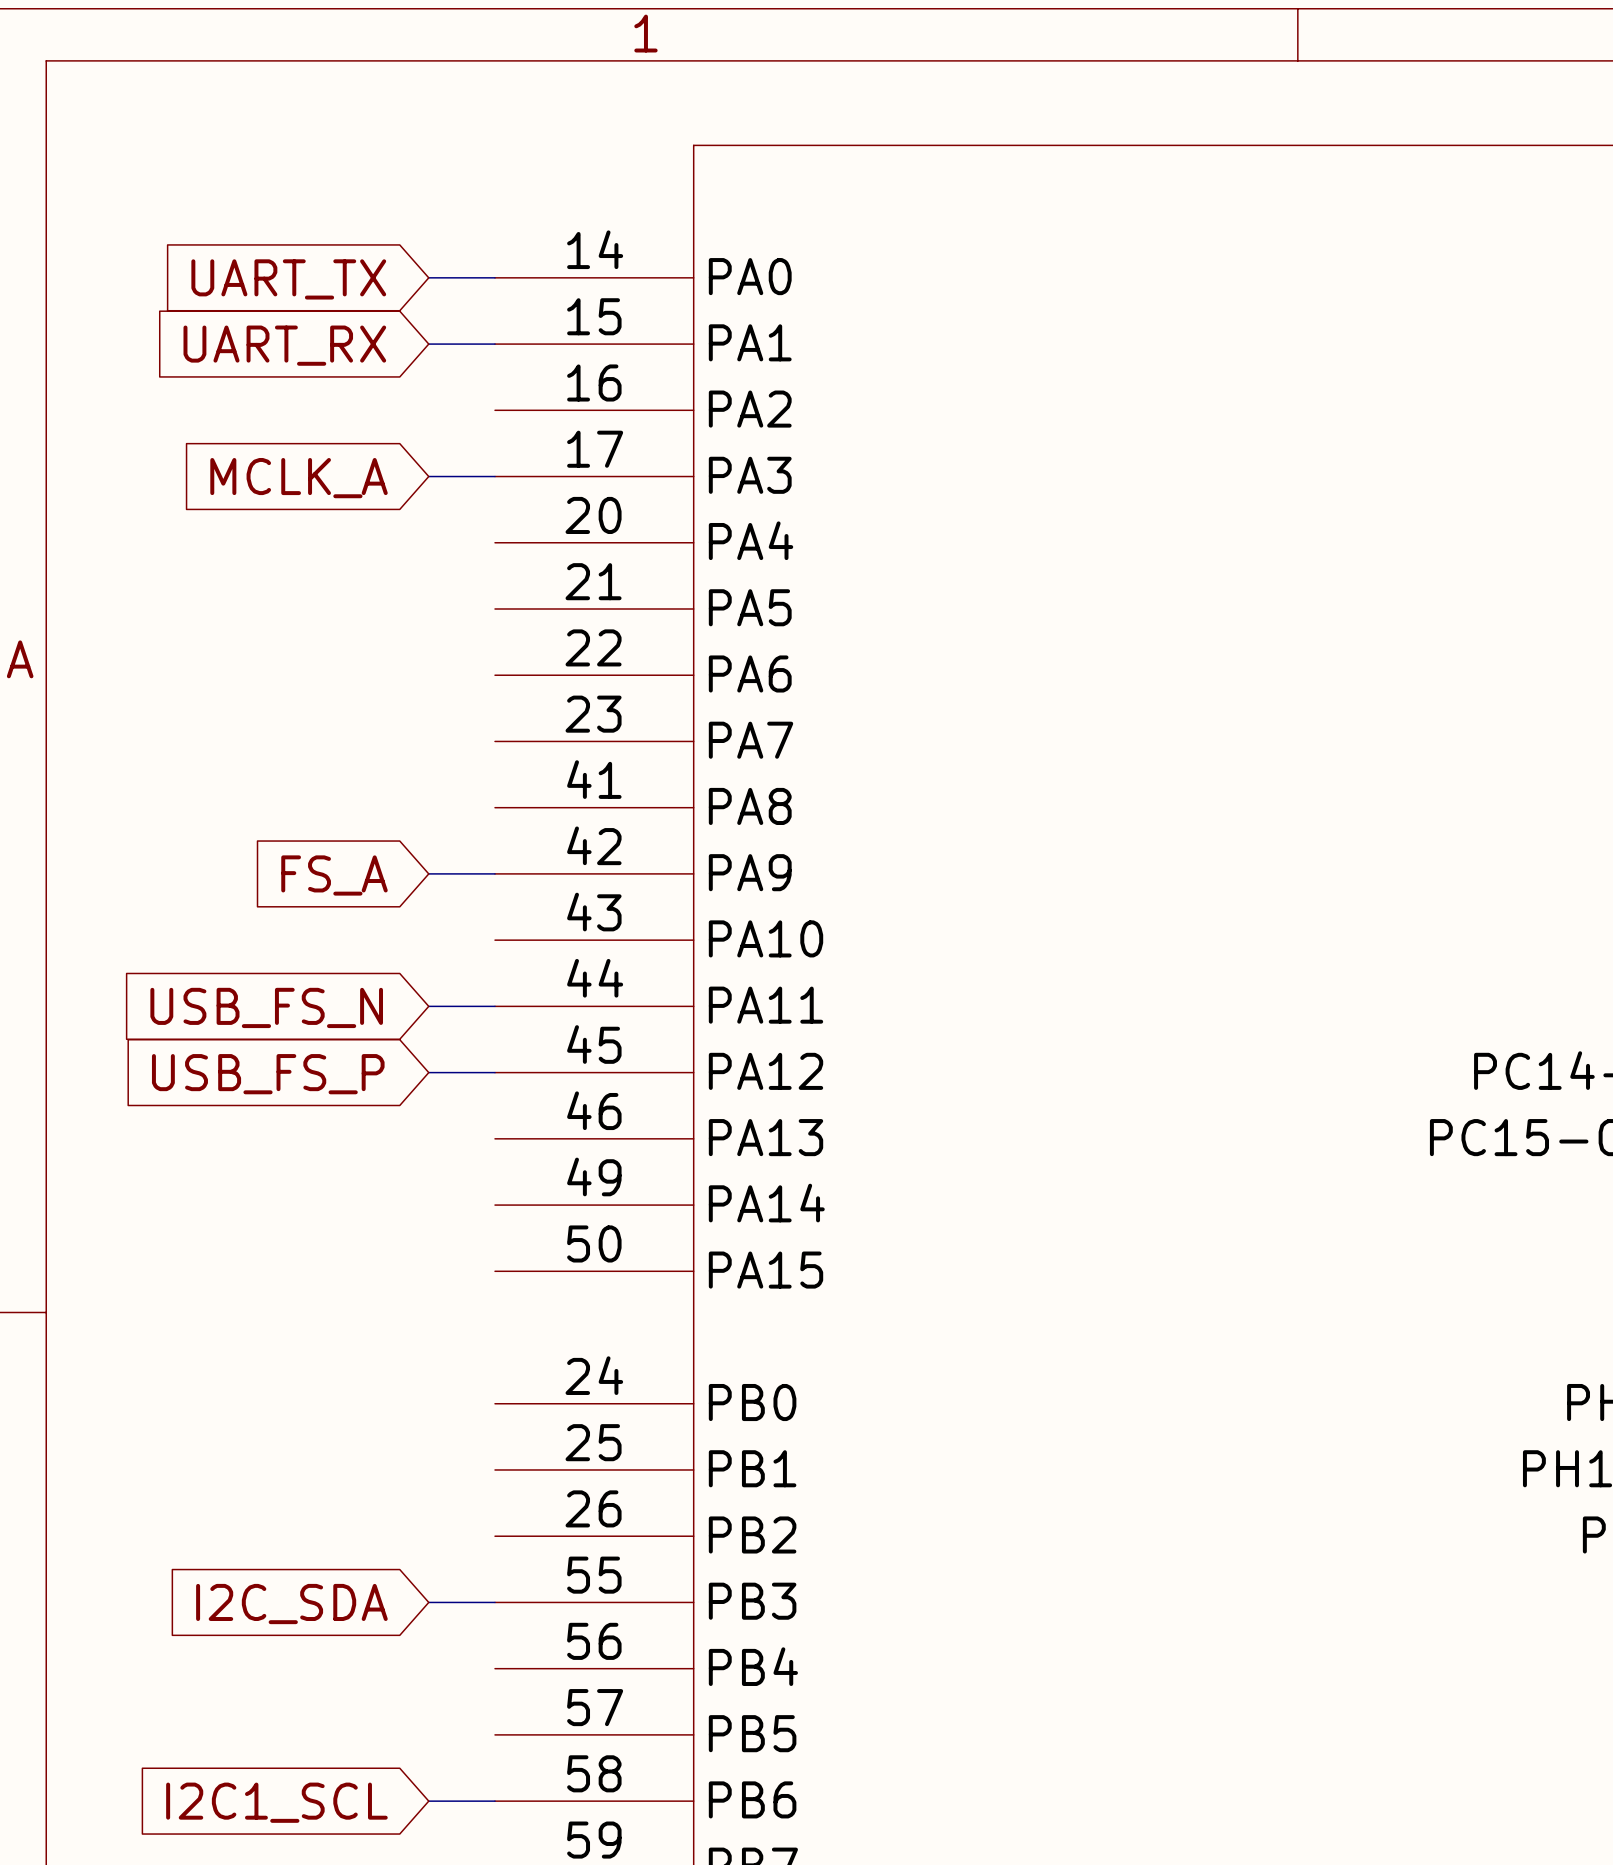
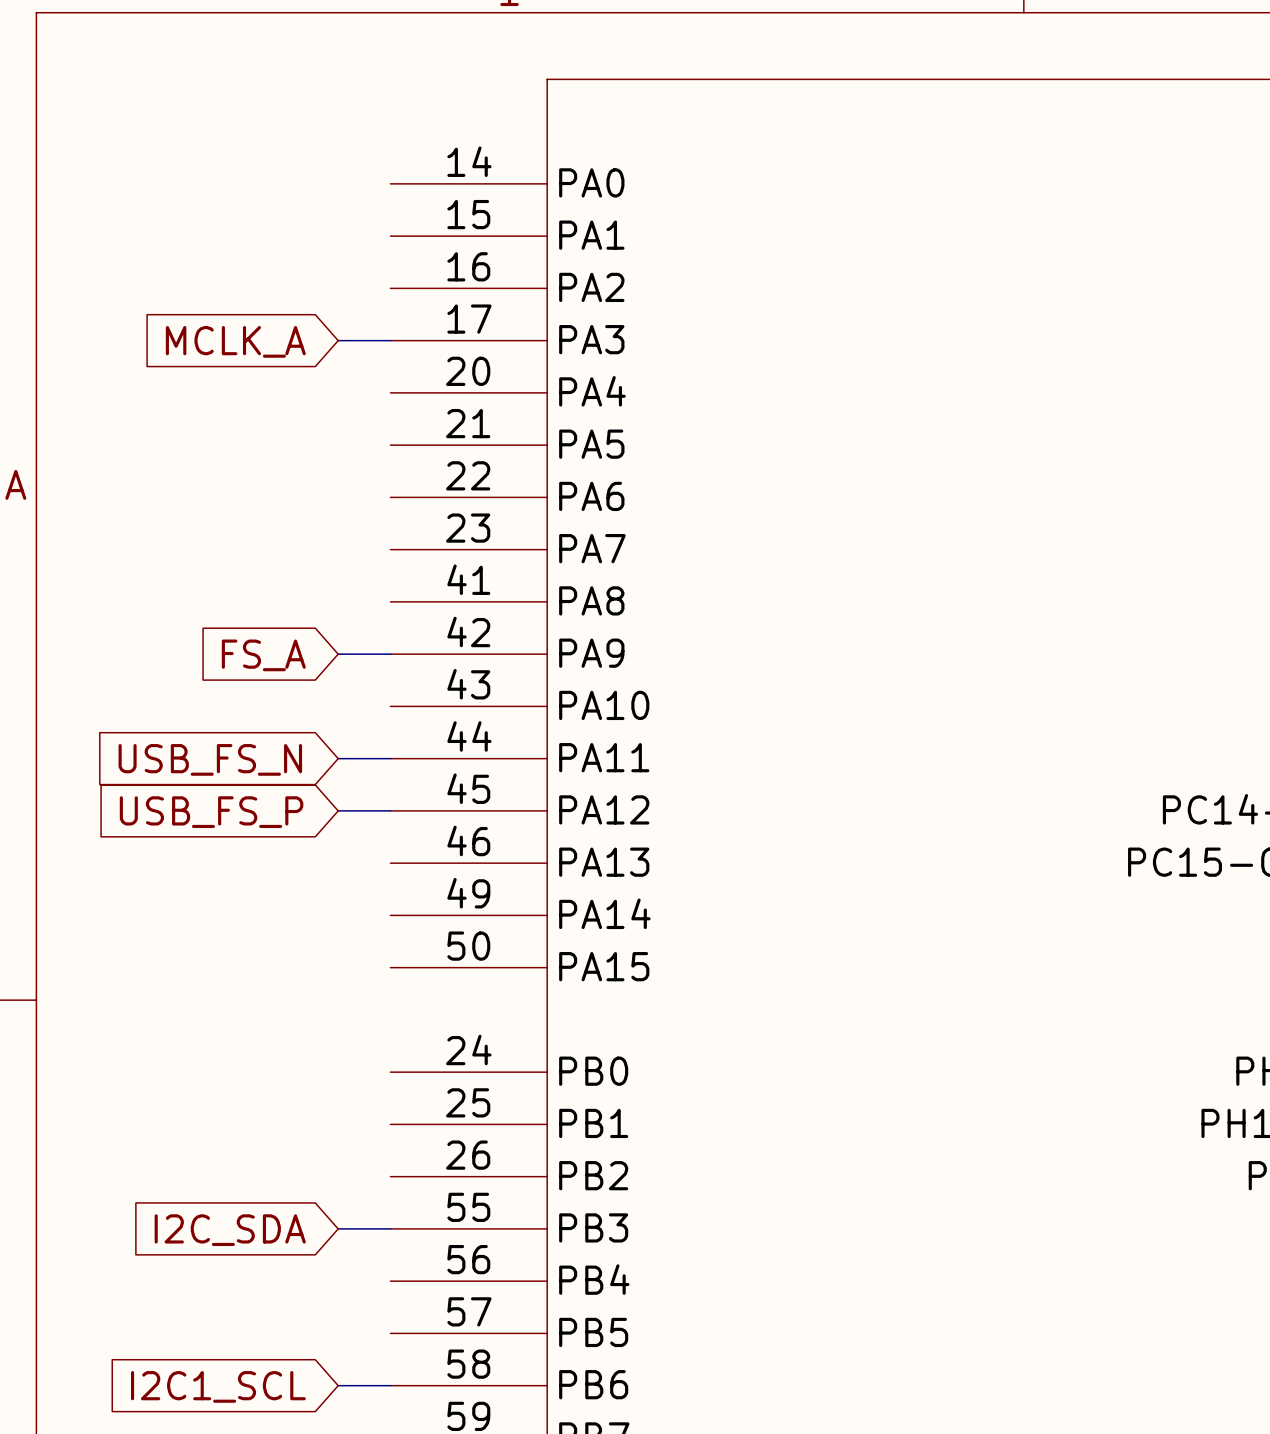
wire: (428, 277) (494, 277) -> none
global label: UART_TX (288, 279) -> none
wire: (428, 344) (494, 344) -> none
global label: UART_RX (284, 345) -> none

